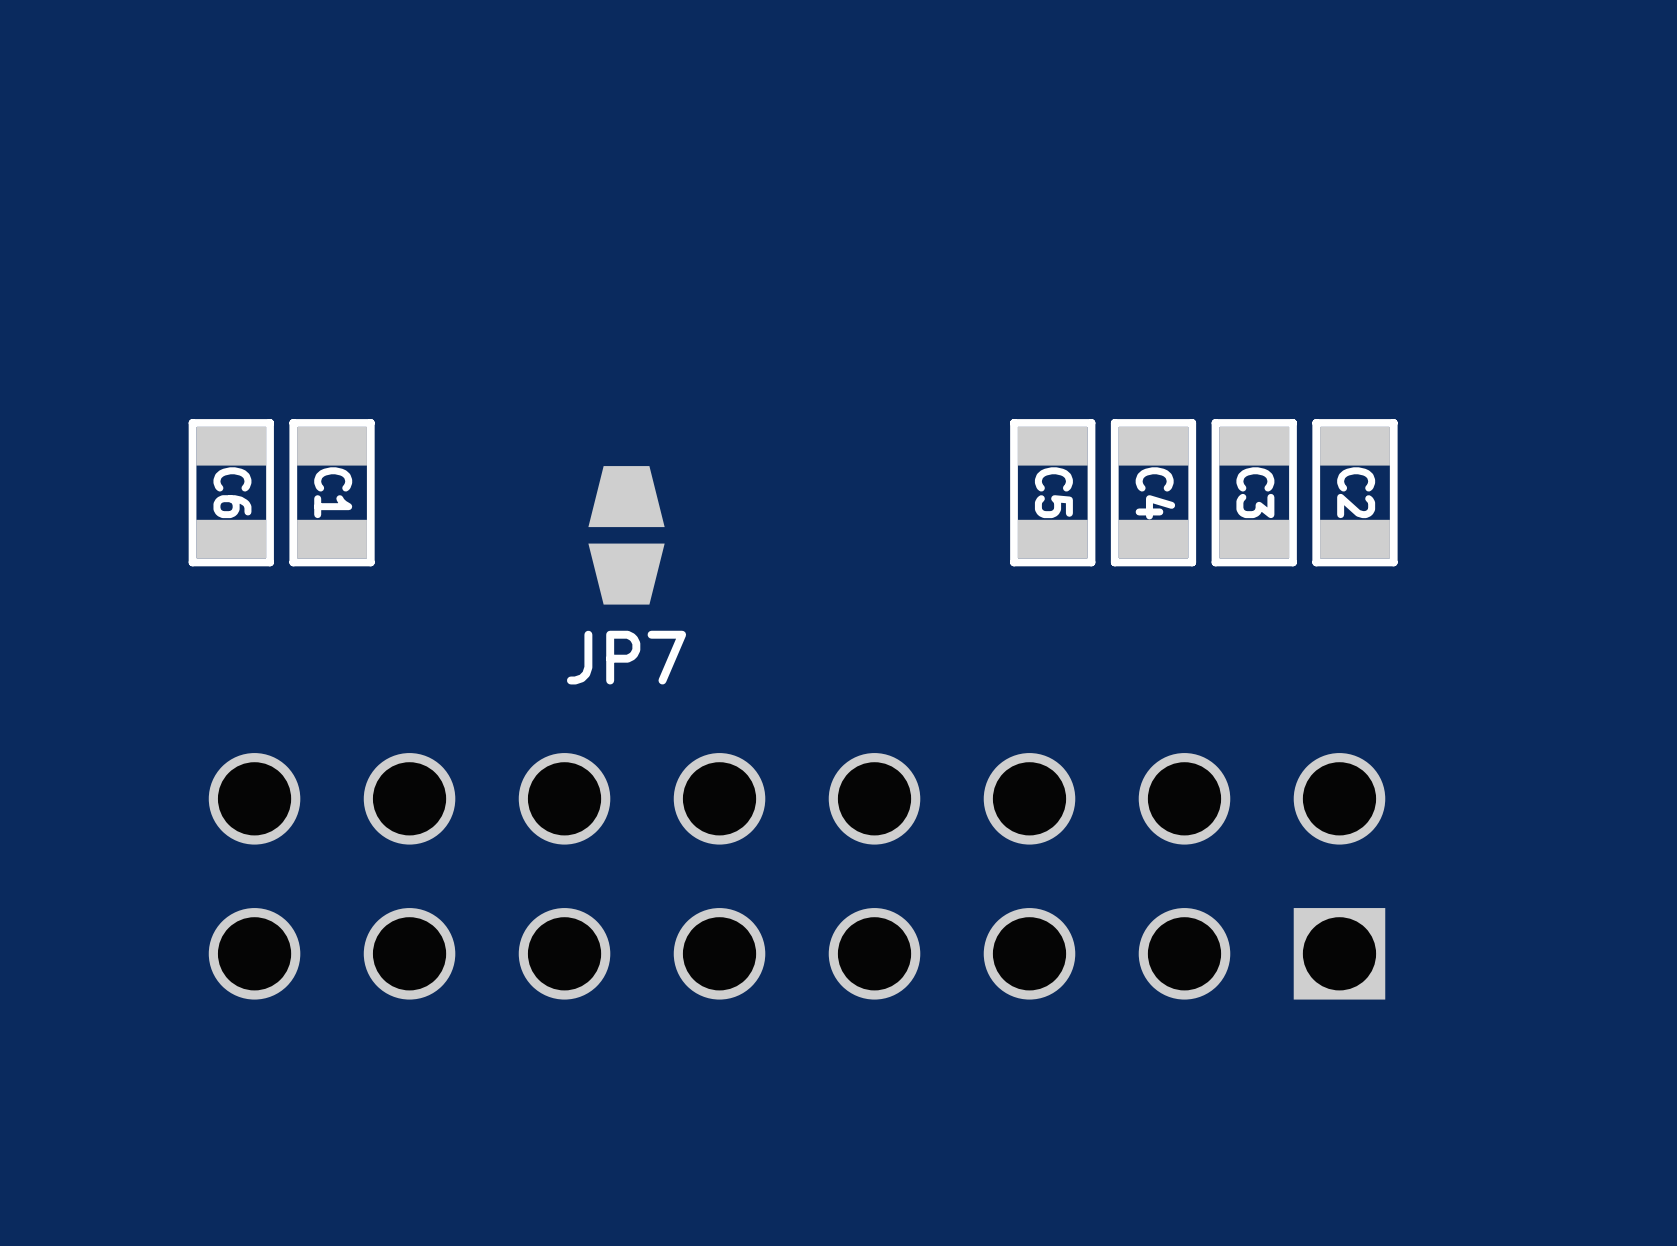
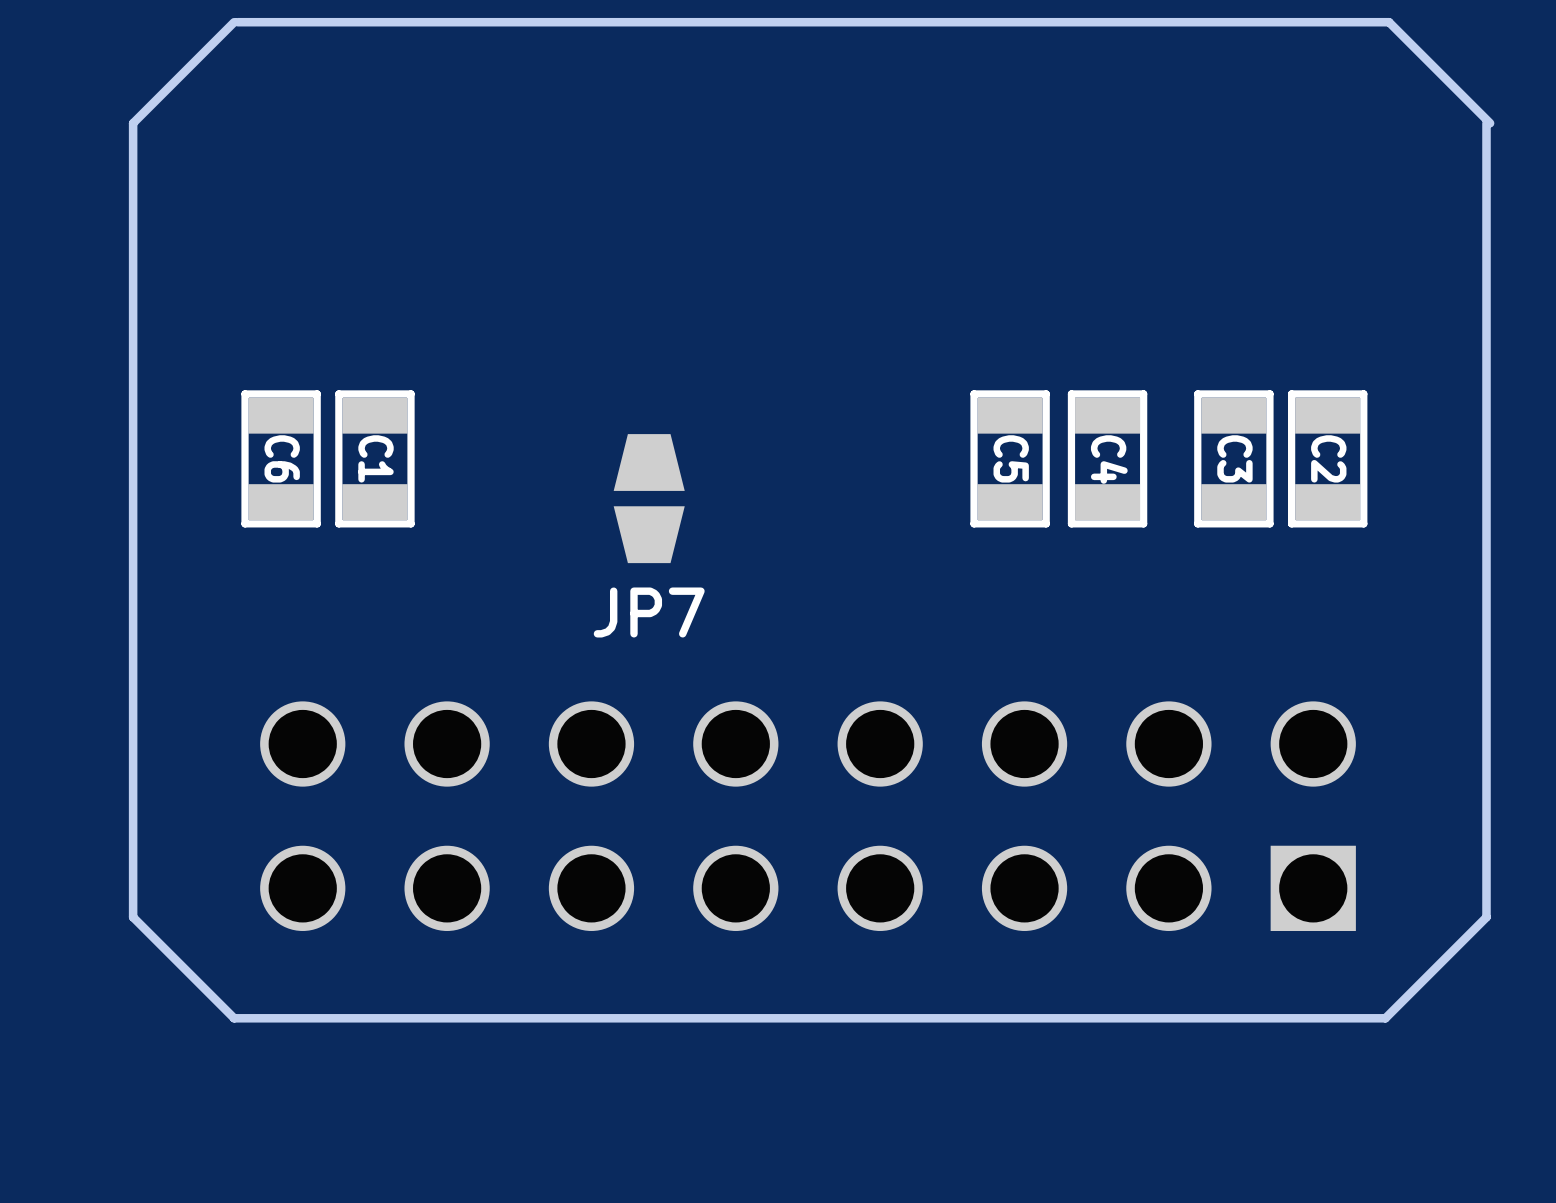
board edge: none -> (234, 22) (133, 123) (133, 917) (234, 1018) (1385, 1018) (1486, 917) (1486, 123)
board edge: none -> (237, 22) (1389, 22) (1490, 123)
C5 position: (1052, 492) -> (1010, 458)
C4 position: (1153, 492) -> (1107, 458)

